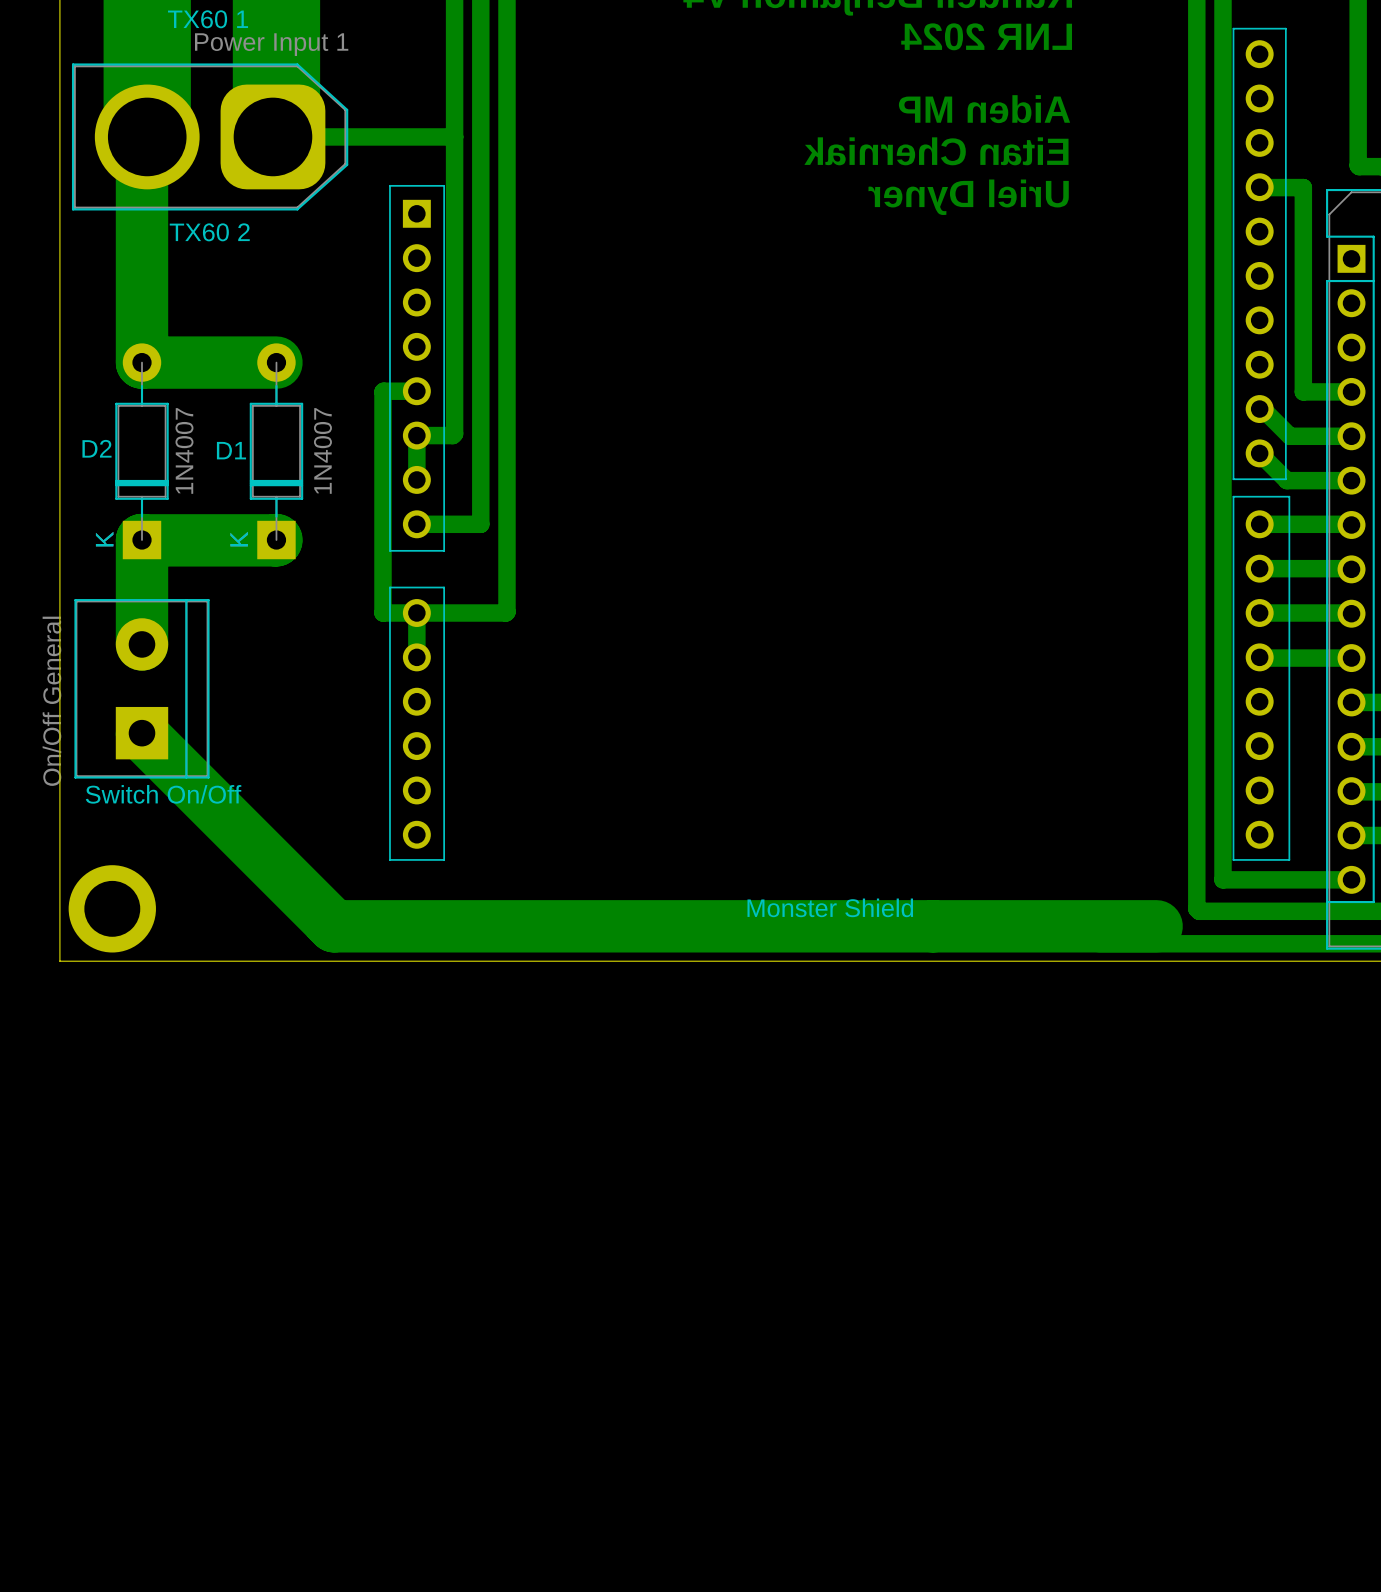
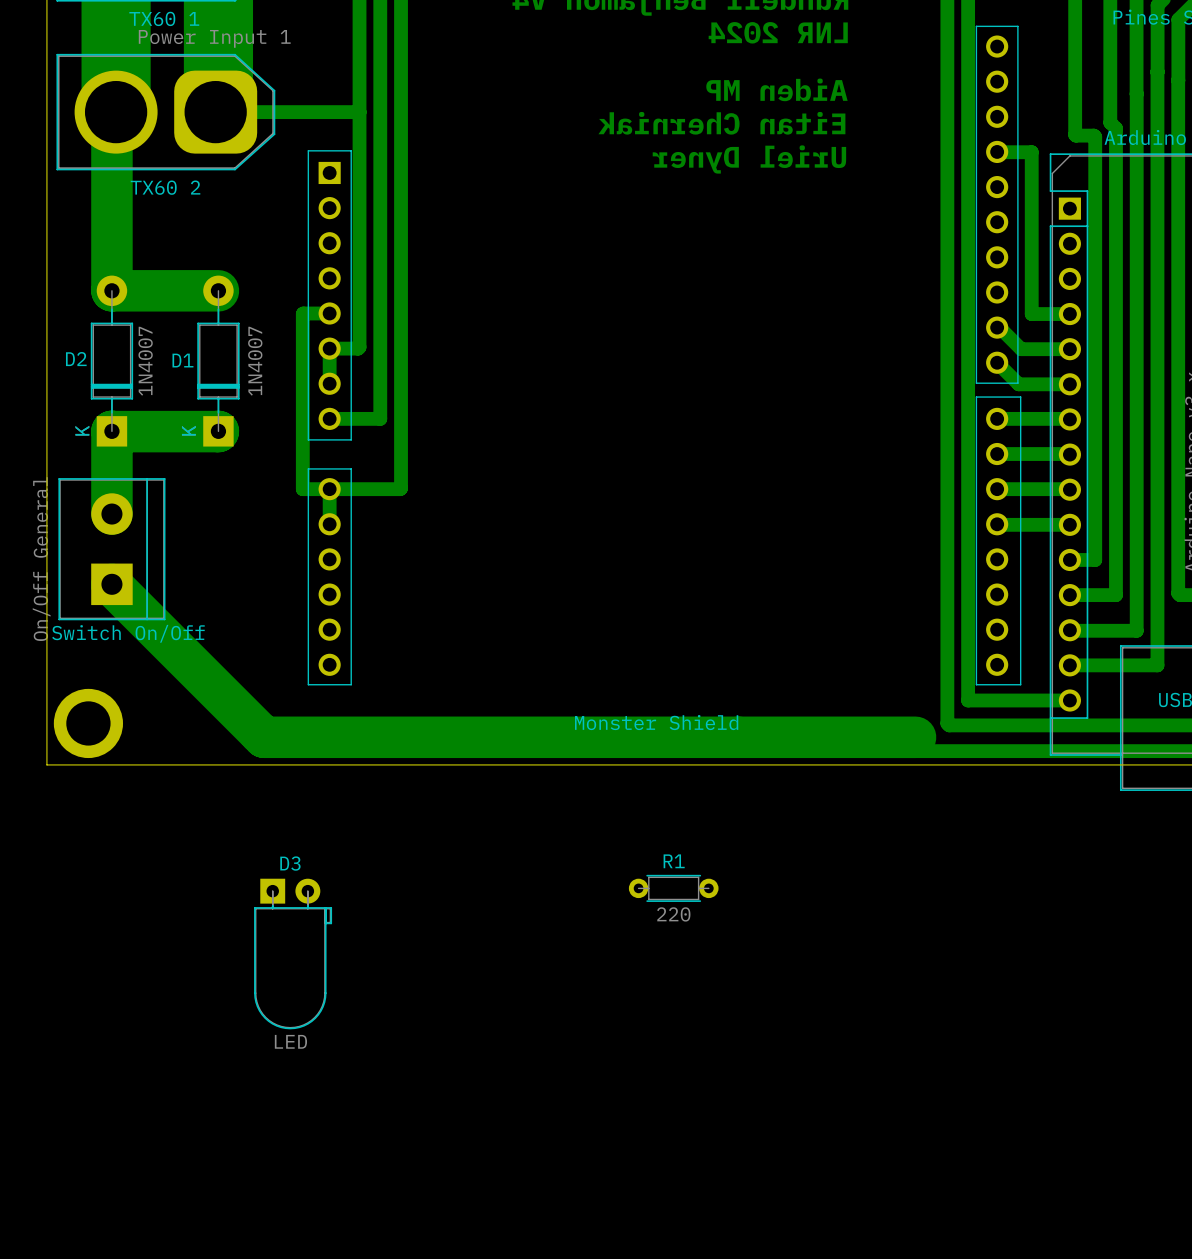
R1: none -> 220 (673, 888)
D3: none -> LED (293, 954)

